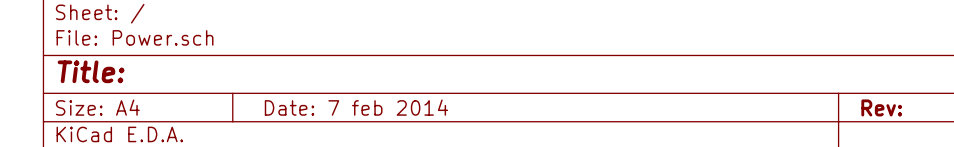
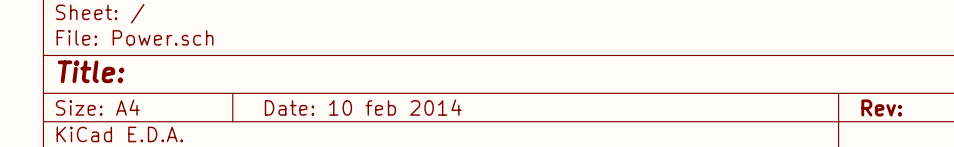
title block: Date: 7 feb 2014 (356, 107) -> Date: 10 feb 2014 (363, 107)

